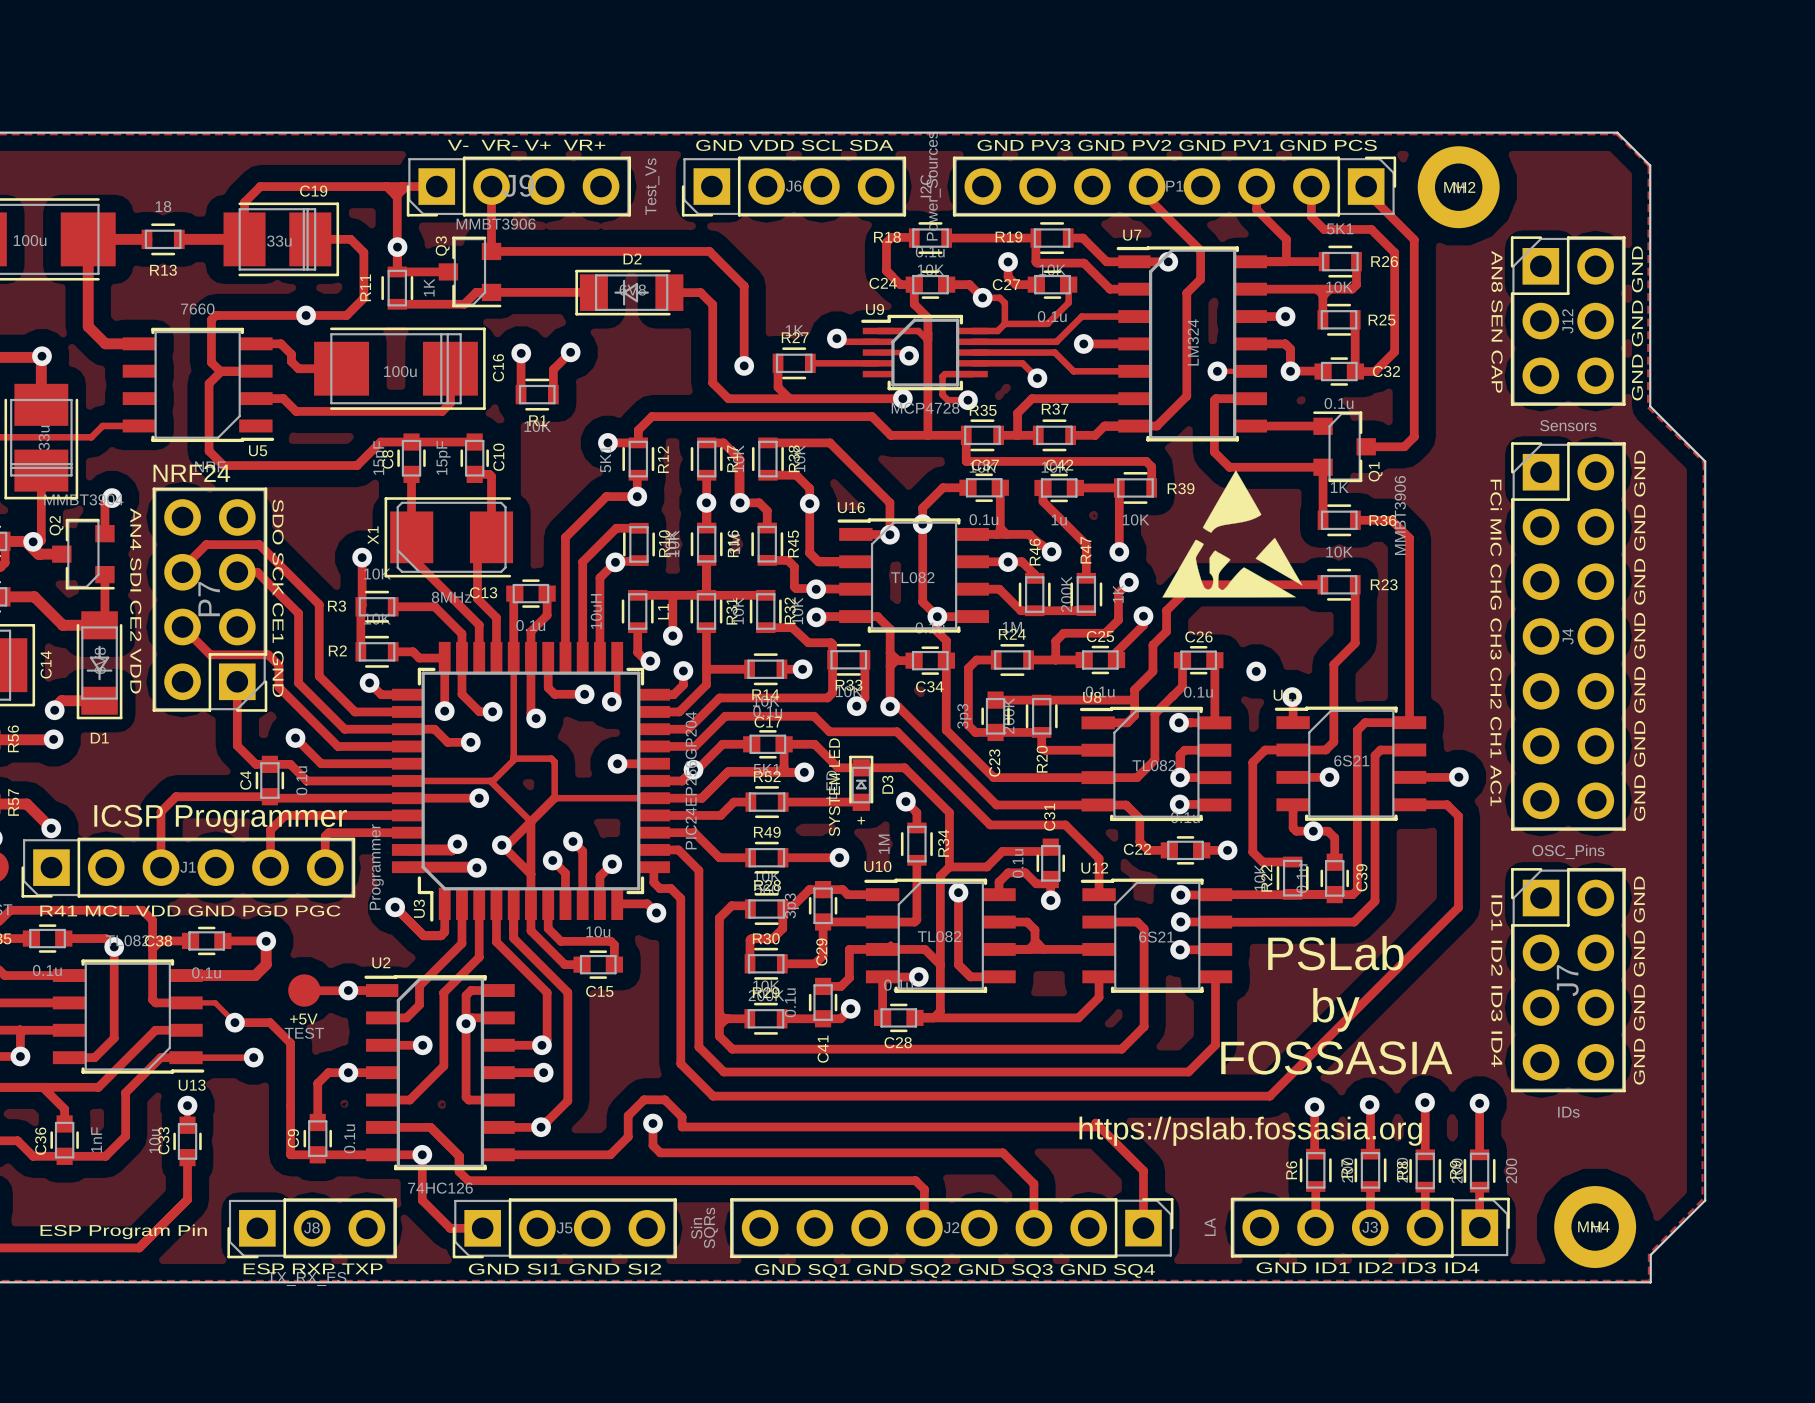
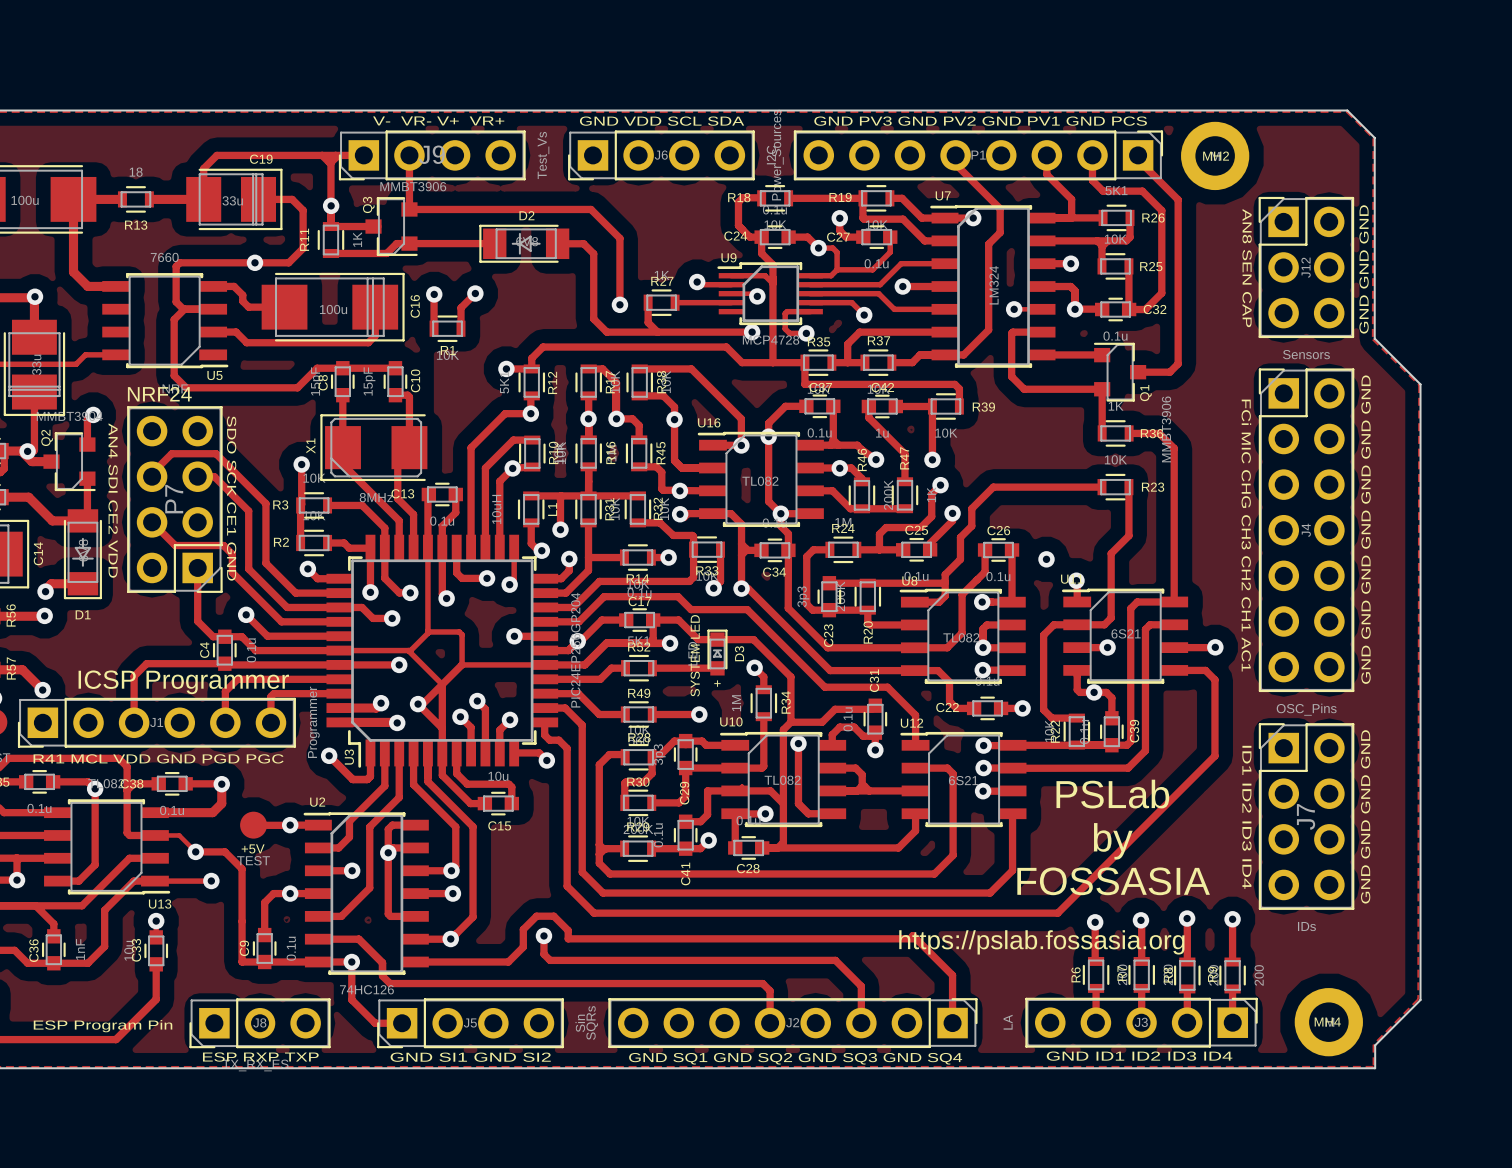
drawing: [1162, 470, 1303, 598] -> none

